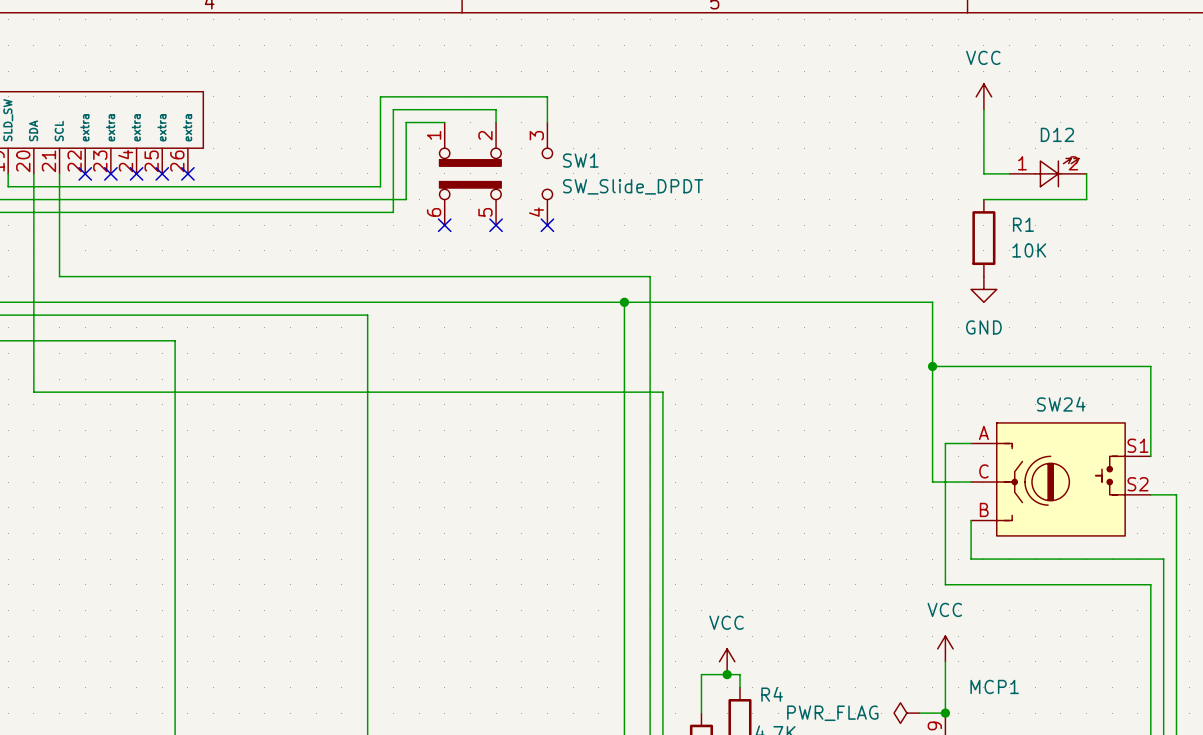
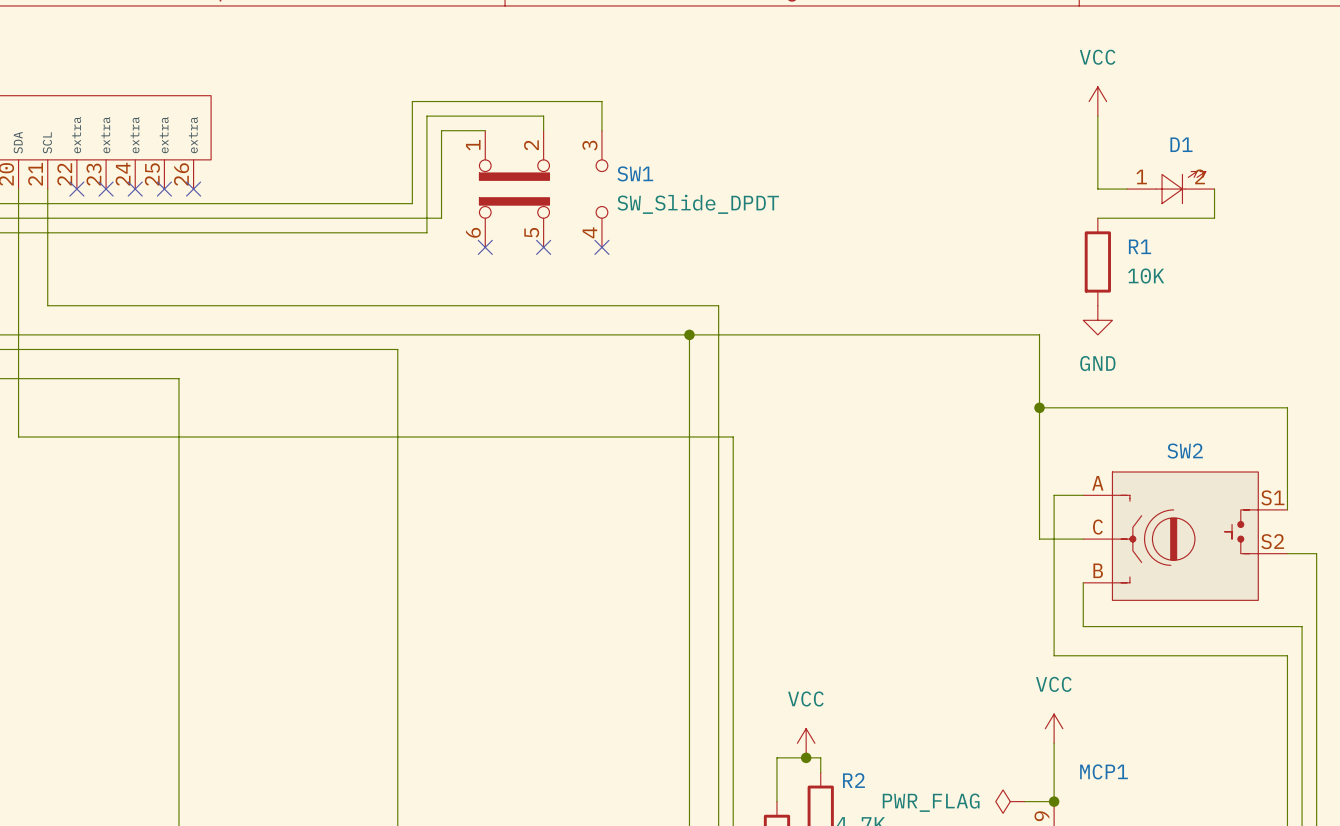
D12 name: D12 (1057, 134) -> D1 (1181, 144)
SW24 name: SW24 (1061, 404) -> SW2 (1185, 451)
R4 name: R4 (772, 694) -> R2 (853, 780)

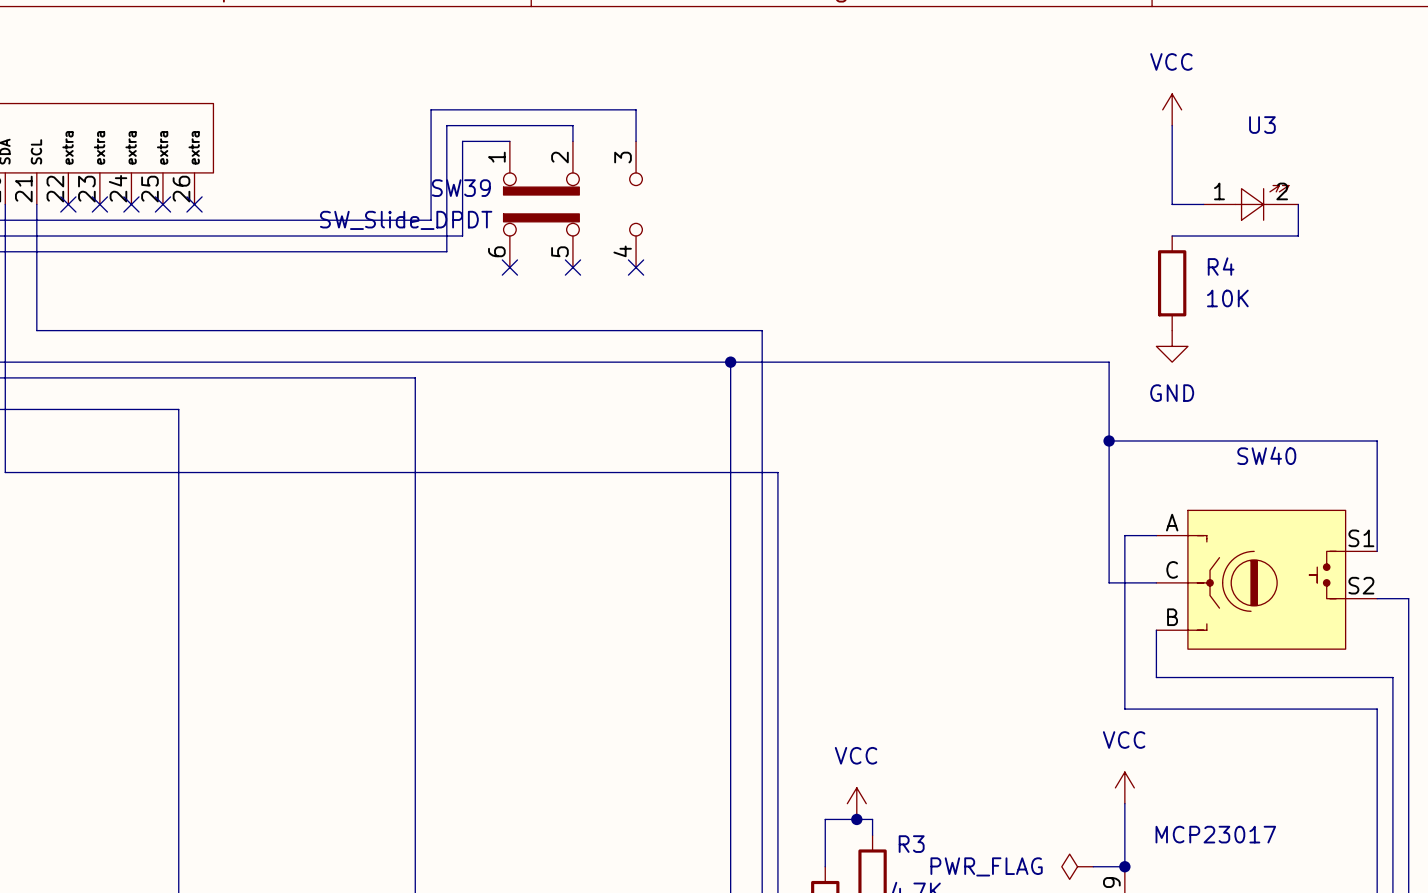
D1 name: D1 (1181, 144) -> U3 (1262, 125)
SW1 name: SW1 (635, 173) -> SW39 (461, 188)
SW1 value position: SW_Slide_DPDT (698, 204) -> SW_Slide_DPDT (406, 220)
R1 name: R1 (1140, 246) -> R4 (1221, 266)
SW2 name: SW2 (1185, 451) -> SW40 (1266, 455)
MCP1 name: MCP1 (1104, 771) -> MCP23017 (1215, 834)
R2 name: R2 (853, 780) -> R3 (911, 844)

